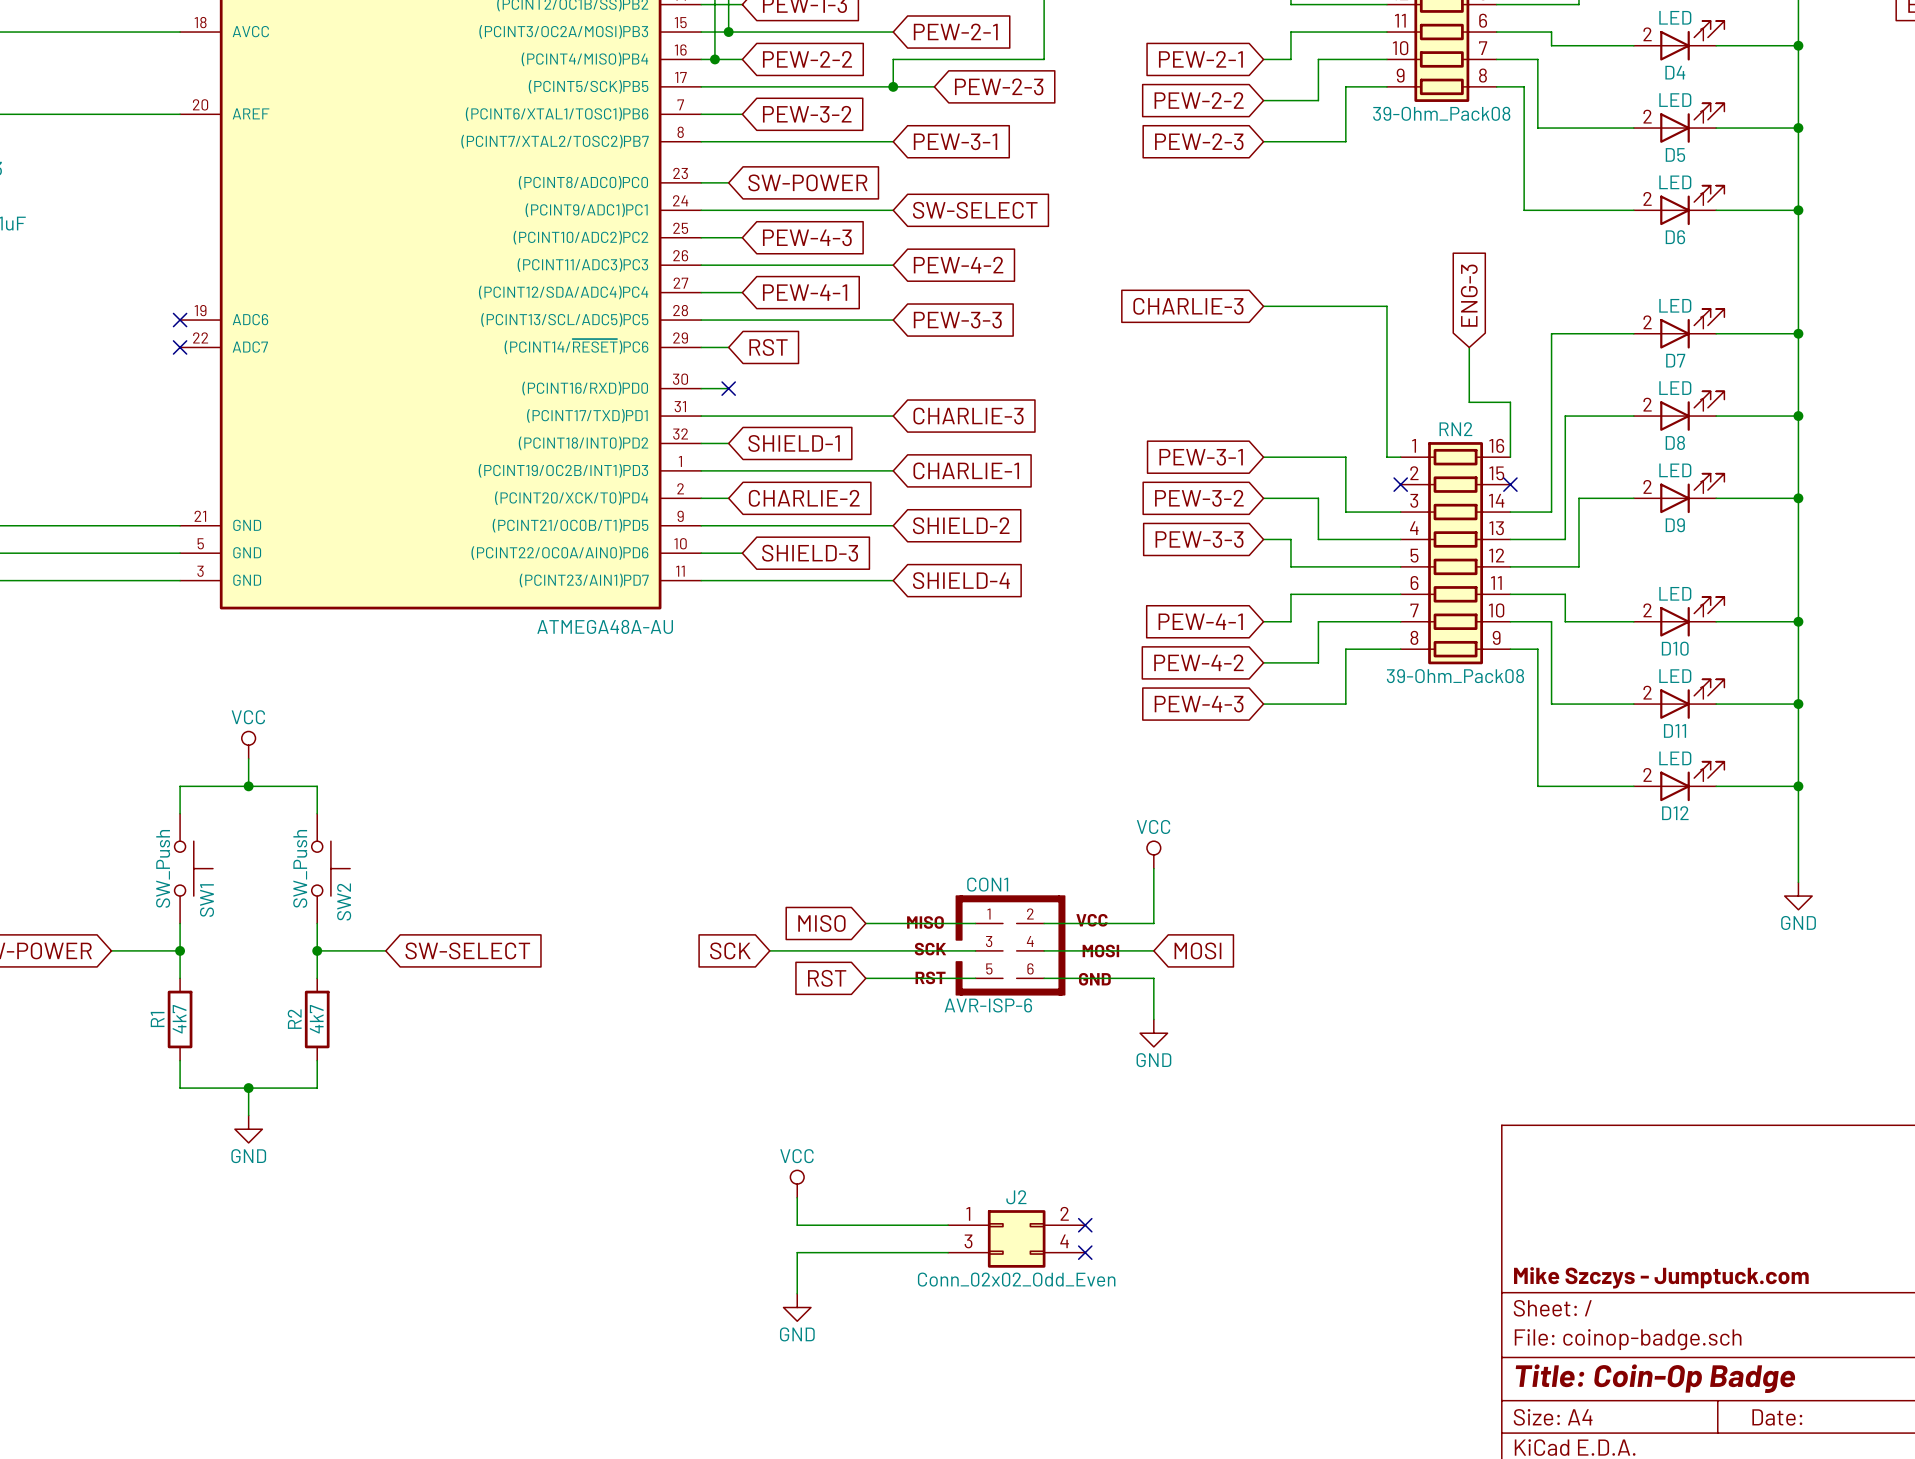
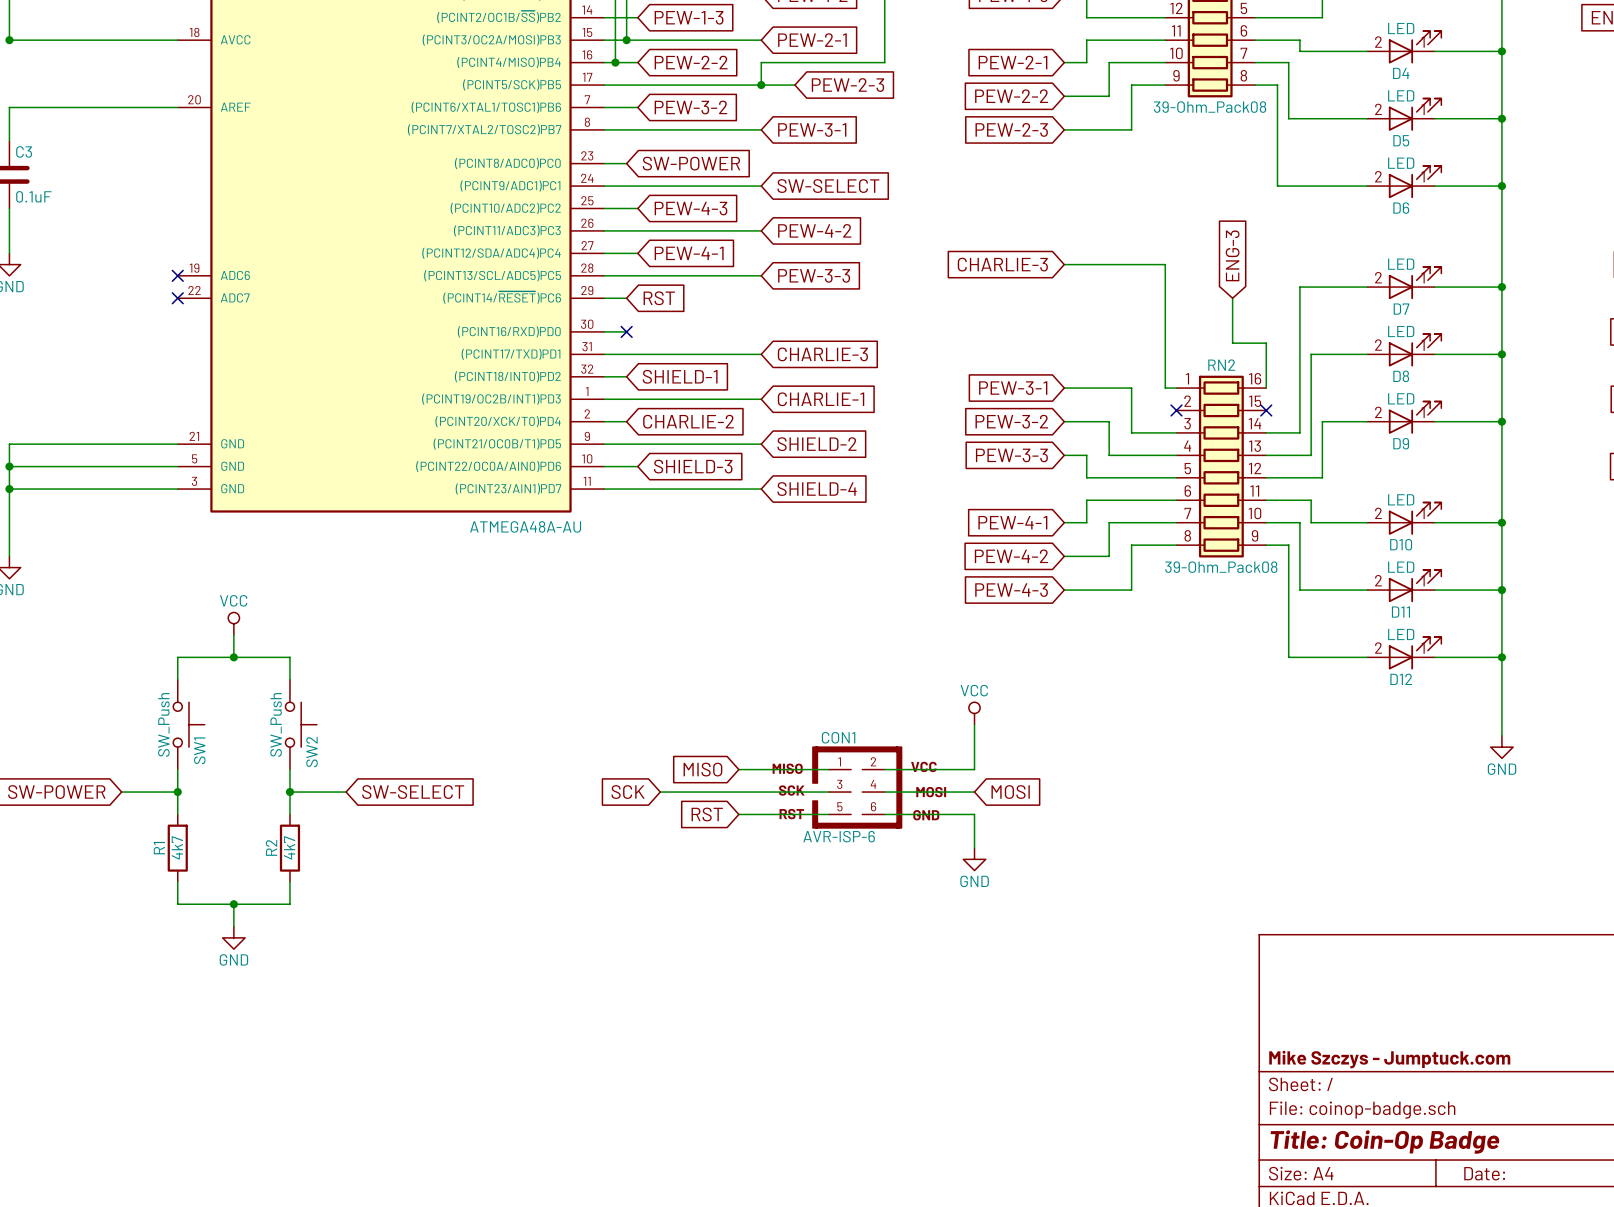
power symbol: VCC (797, 1184) -> none
wire: (797, 1197) (797, 1225) (948, 1225) -> none
no-connect mark: (1085, 1225) -> none
J2: Conn_02x02_Odd_Even (1016, 1238) -> none
wire: (948, 1252) (797, 1252) (797, 1293) -> none
no-connect mark: (1085, 1252) -> none
power symbol: GND (797, 1307) -> none

